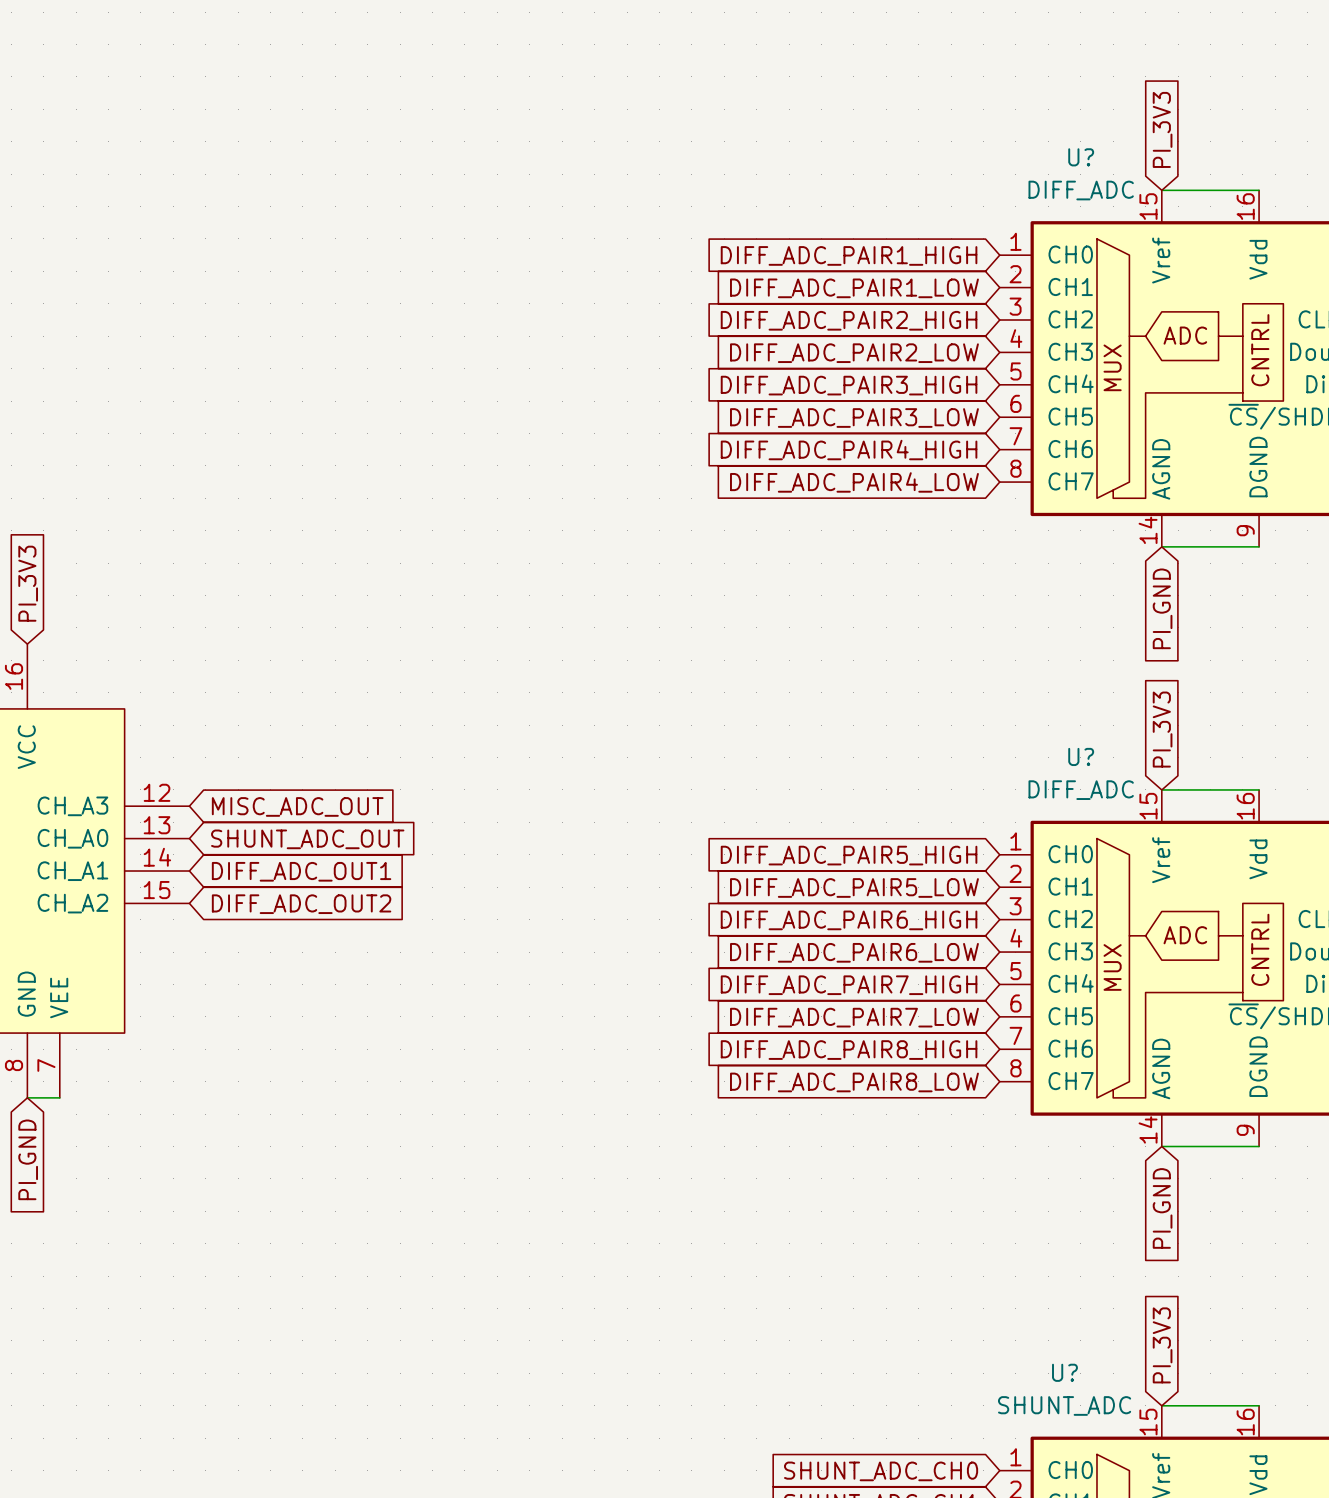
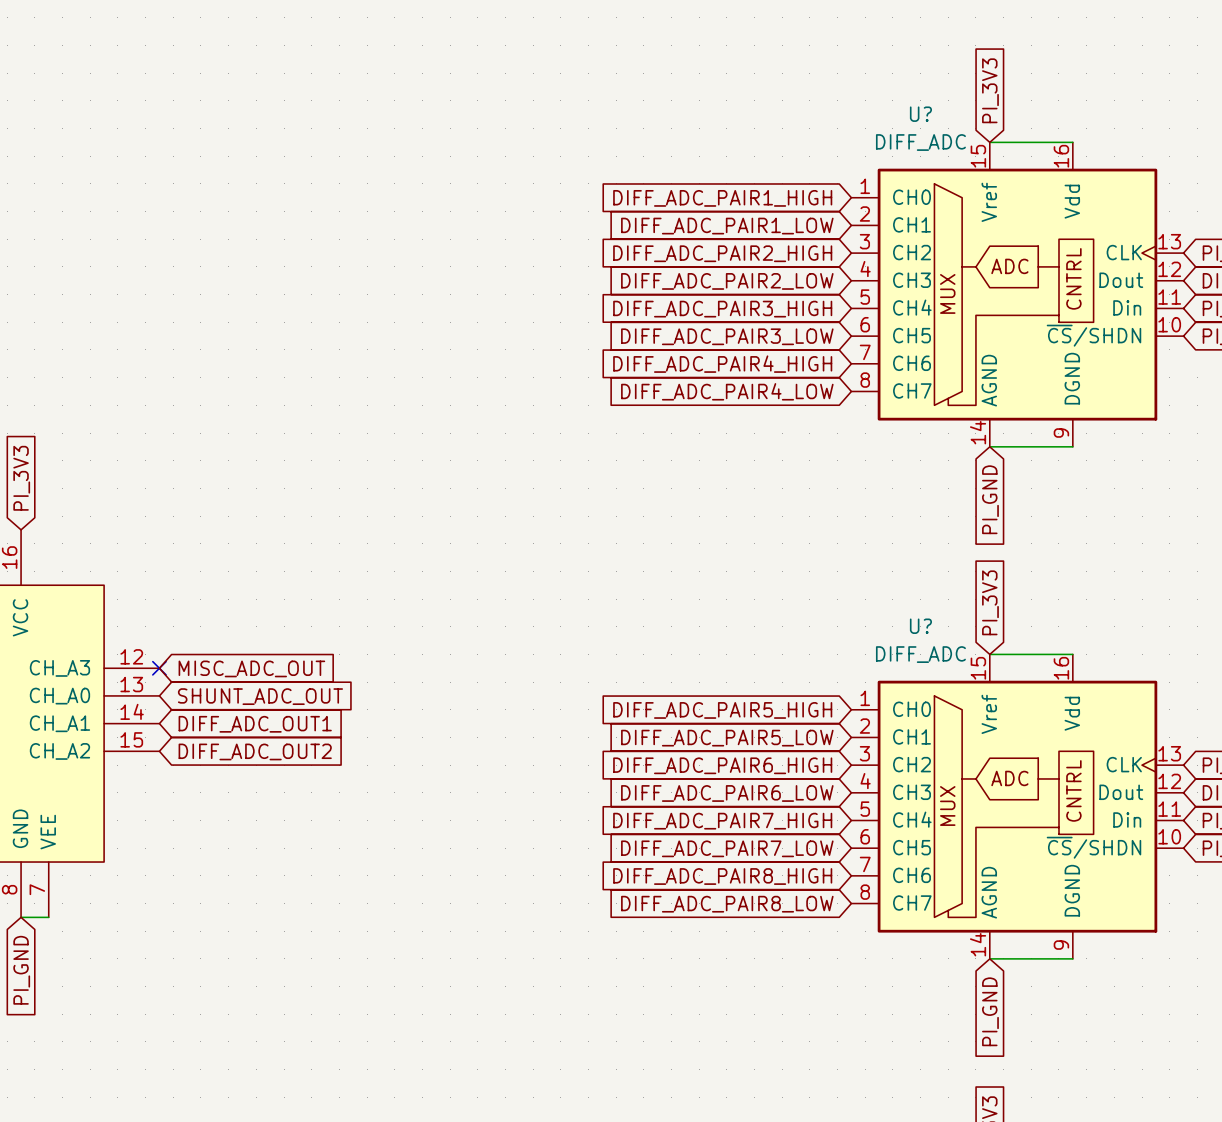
no-connect mark: none -> (159, 668)

